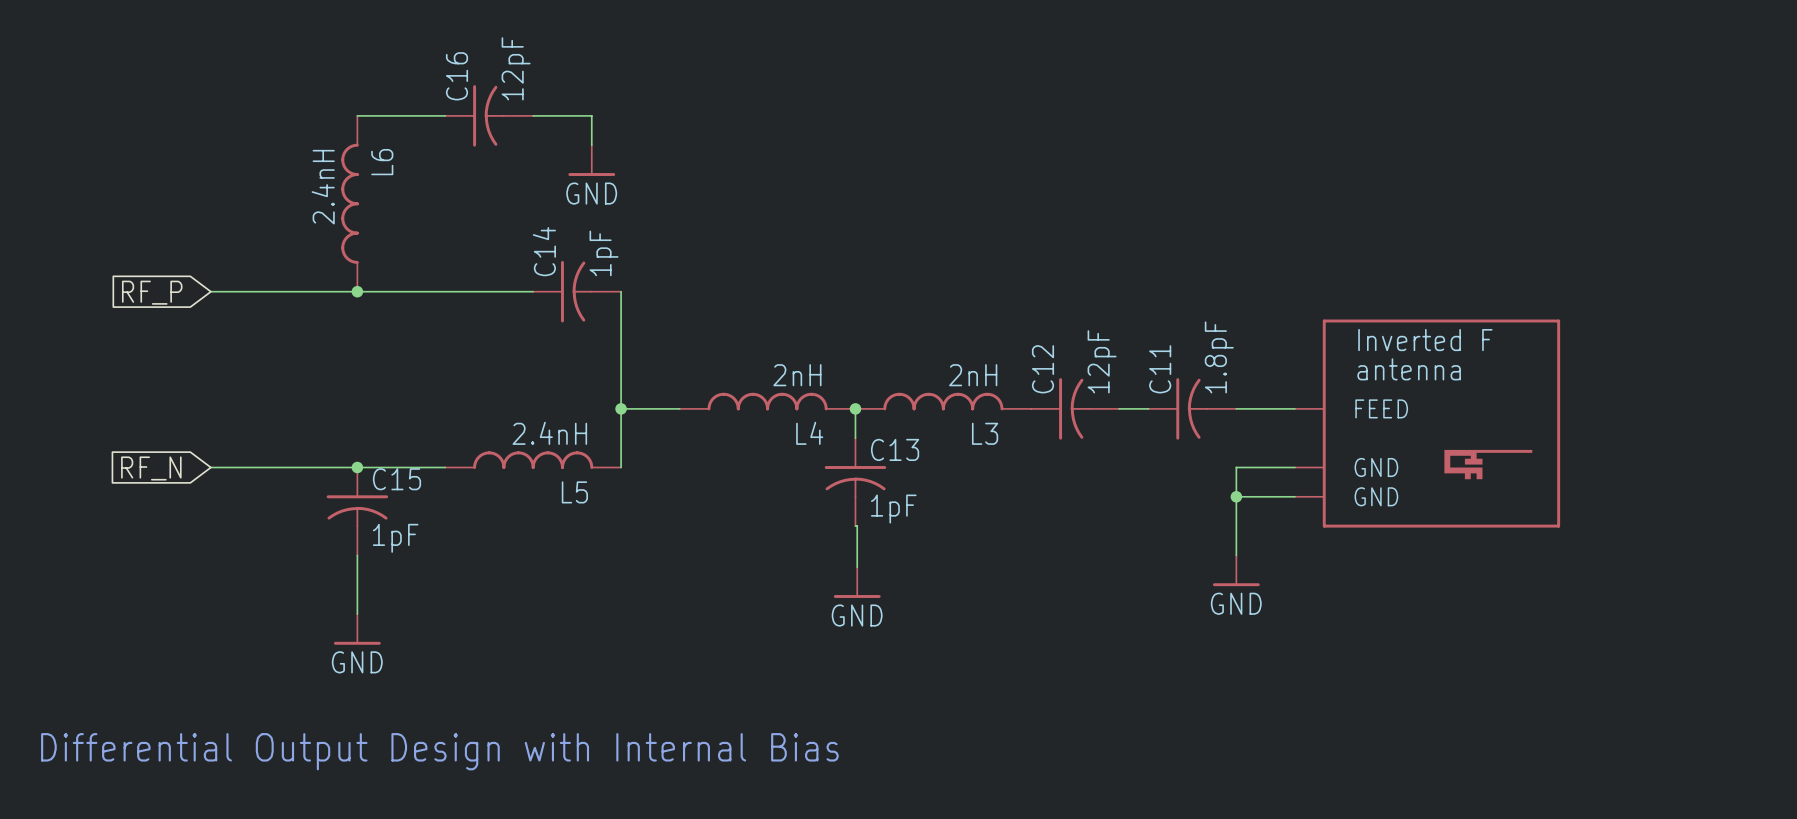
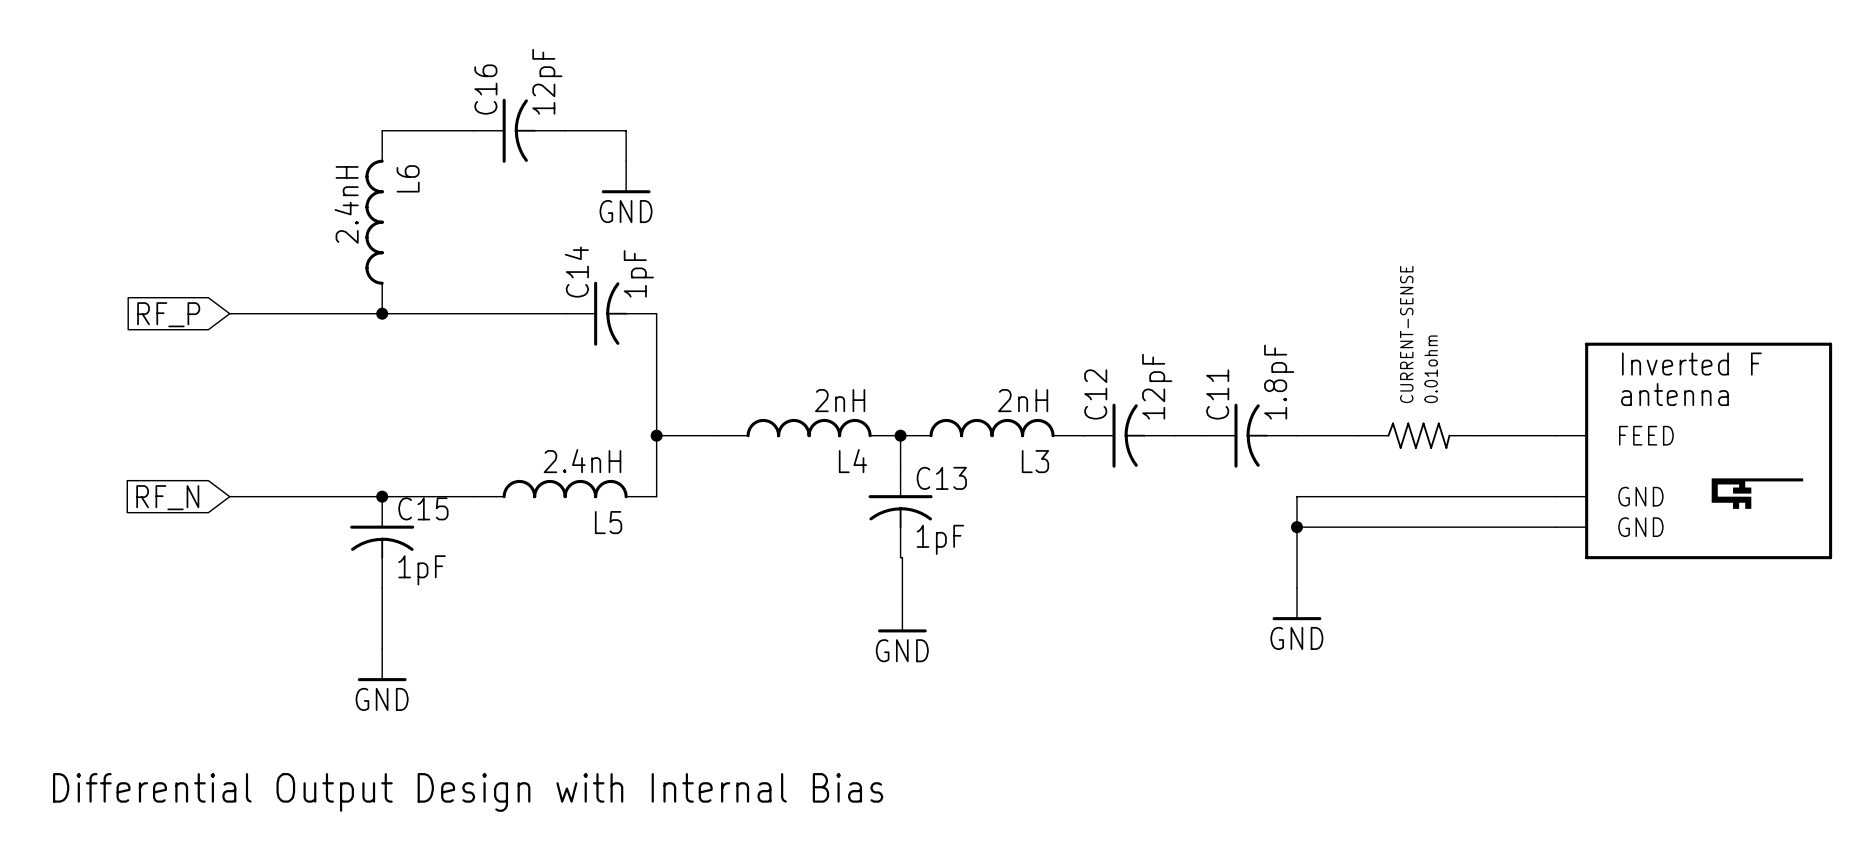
CURRENT-SENSE: none -> 0.01ohm (1418, 435)
wire: none -> (1479, 435) (1556, 435)
part position: (1427, 423) -> (1694, 450)
wire: none -> (1357, 496) (1556, 496)
wire: none -> (1357, 527) (1556, 527)

